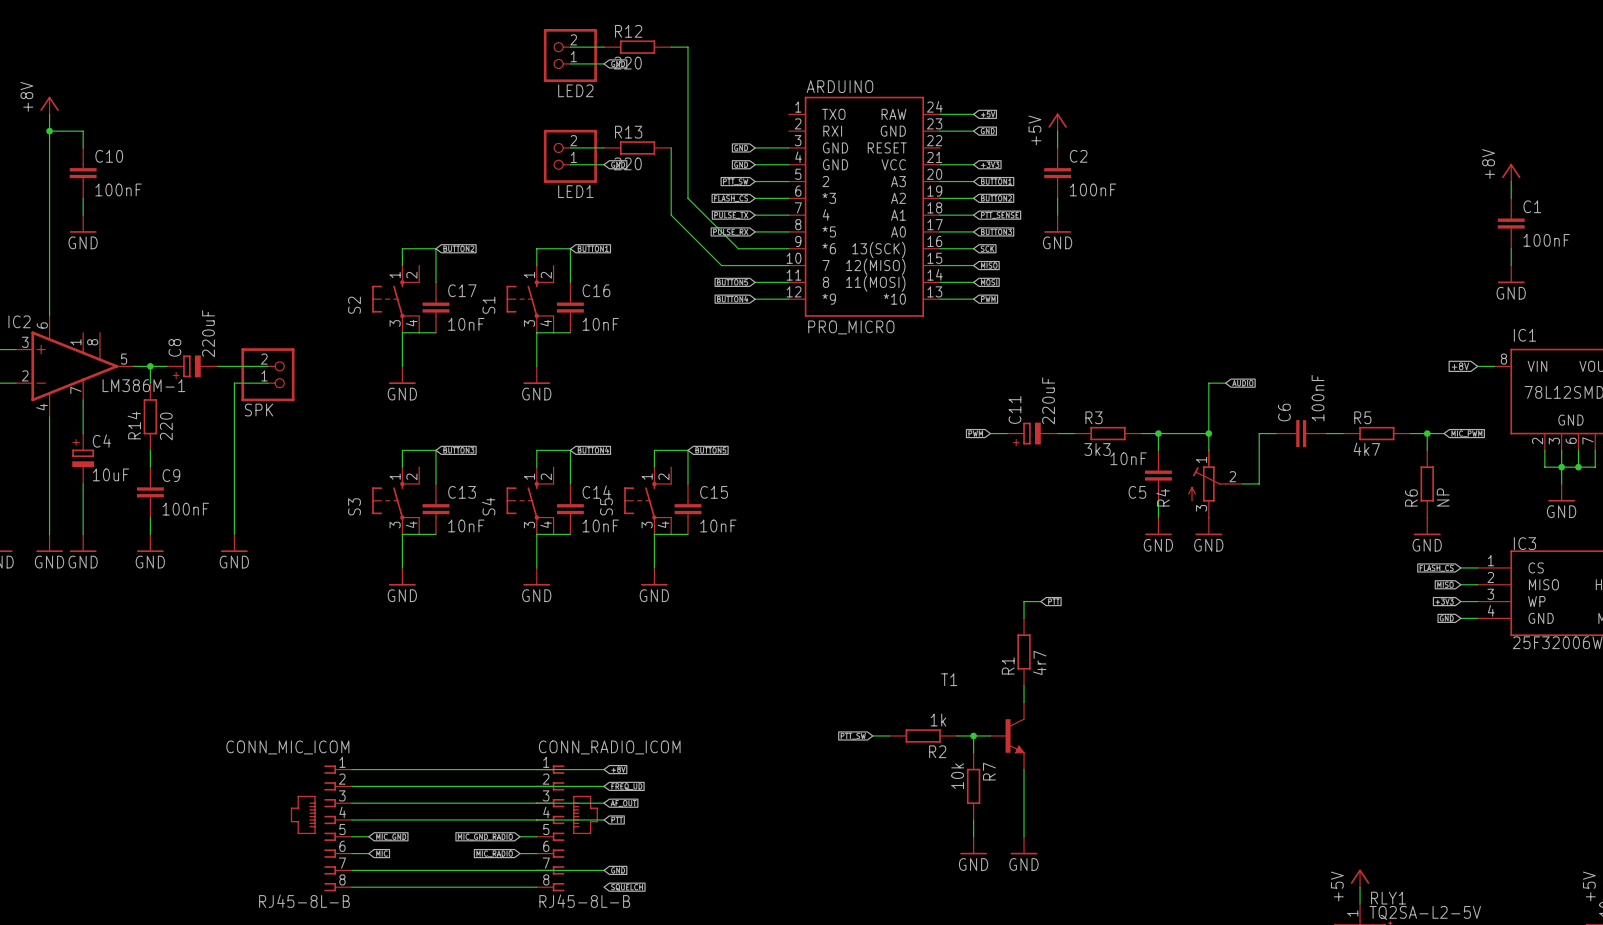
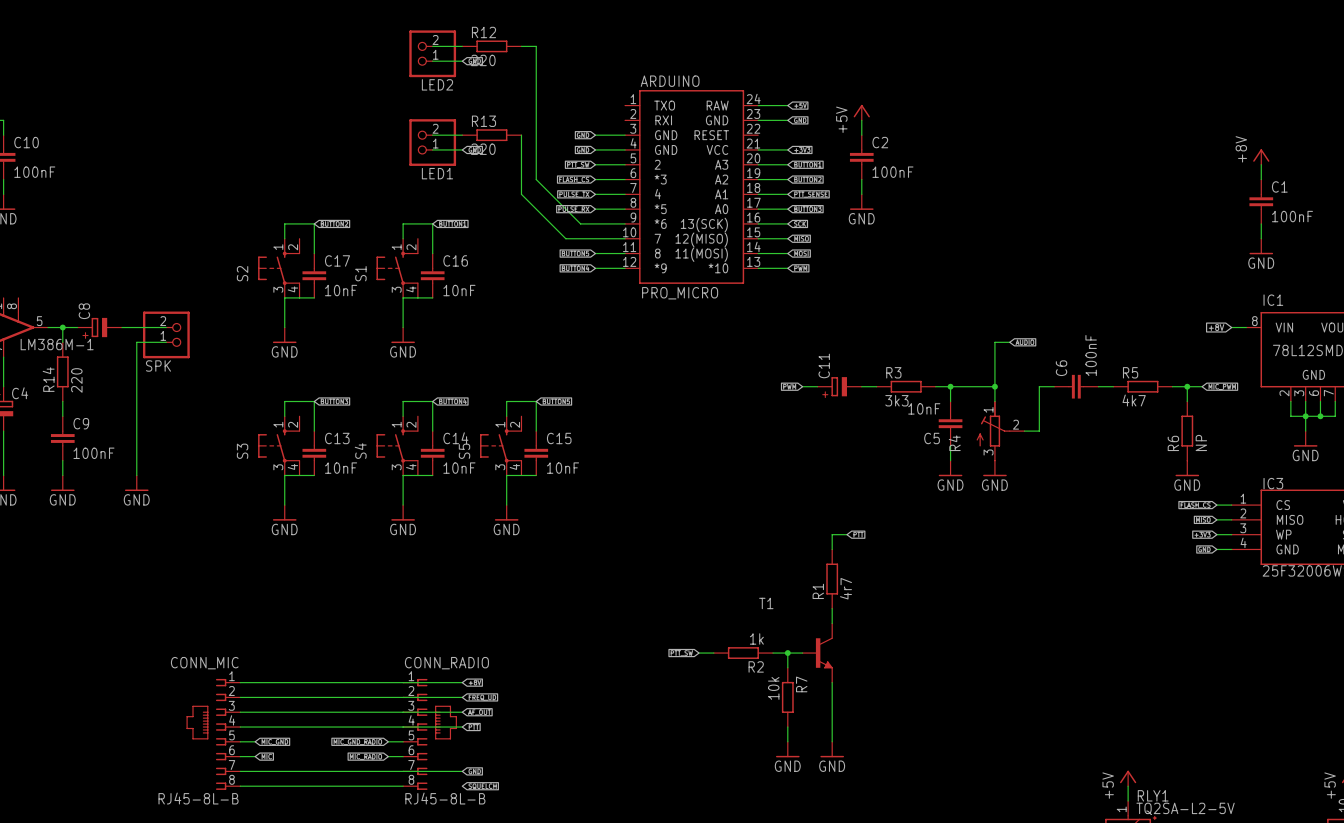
C8 value: 220uF (208, 333) -> none
C11 value: 220uF (1048, 400) -> none
C4 value: 10uF (111, 474) -> none
CONN_MIC_ICOM name: CONN_MIC_ICOM (287, 747) -> CONN_MIC (204, 663)
CONN_RADIO_ICOM name: CONN_RADIO_ICOM (609, 747) -> CONN_RADIO (446, 663)

